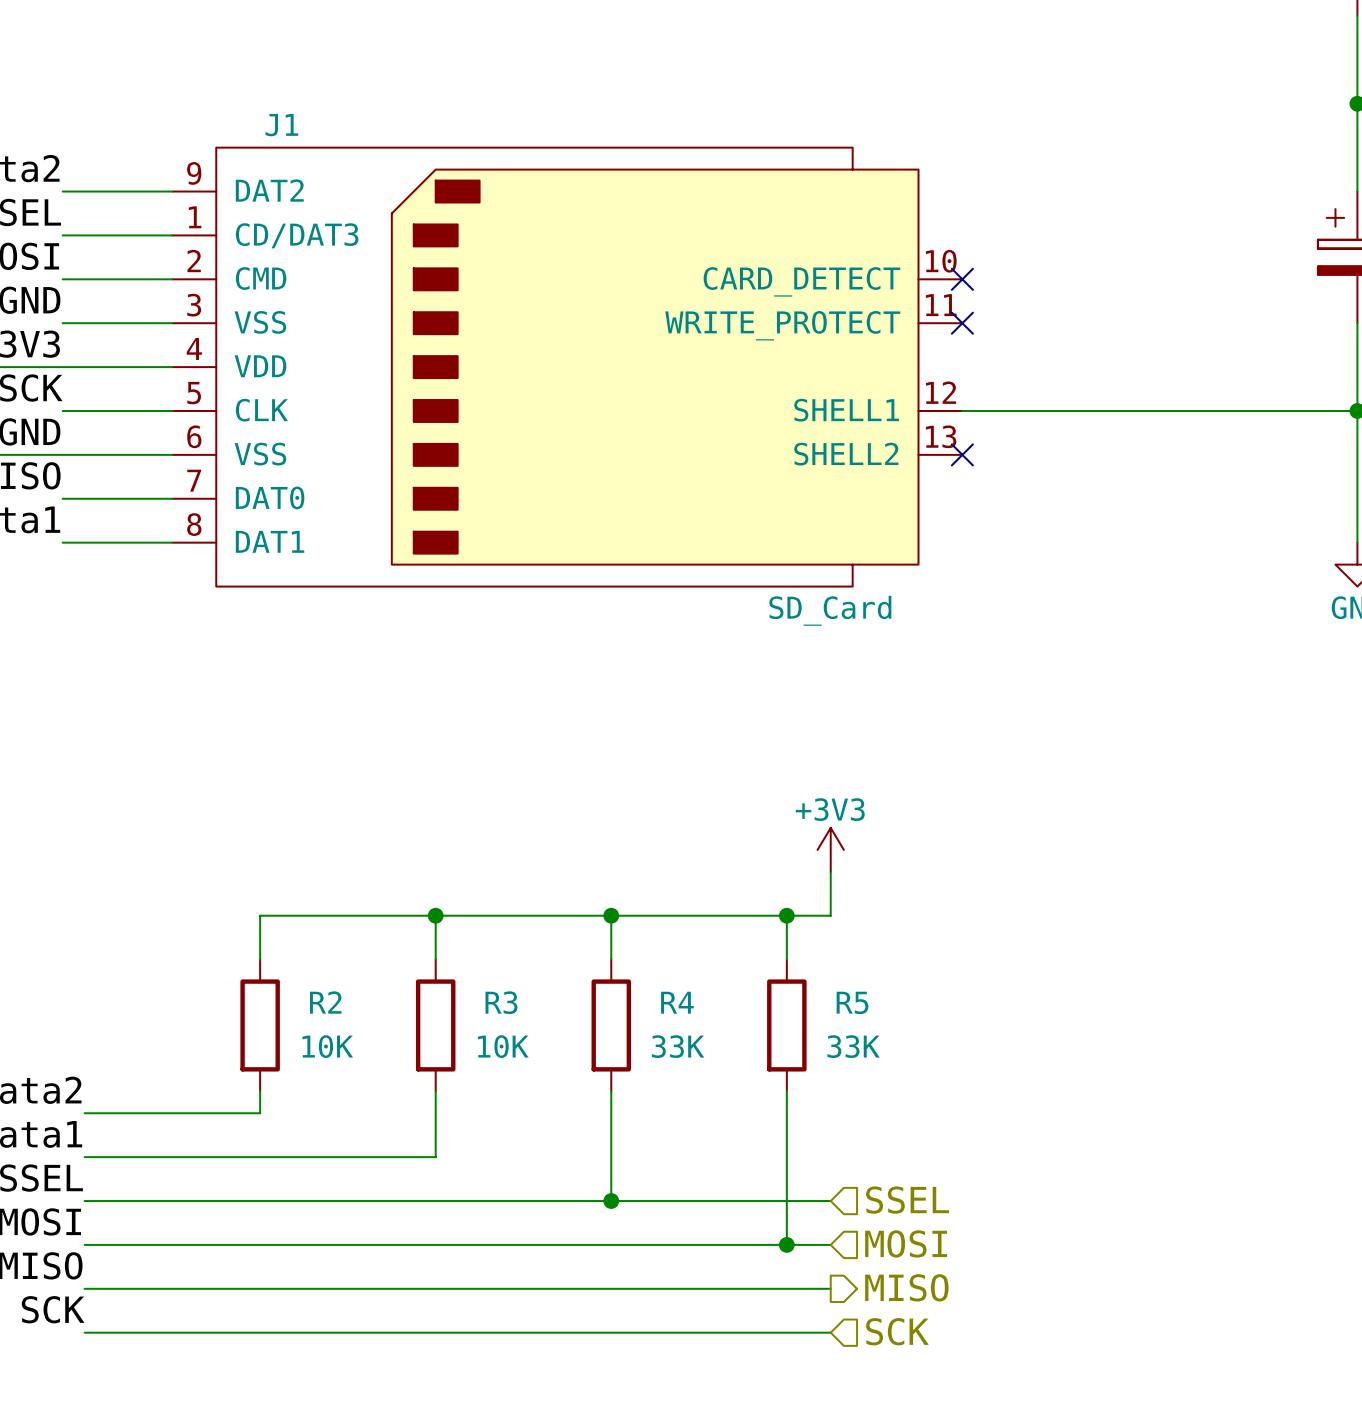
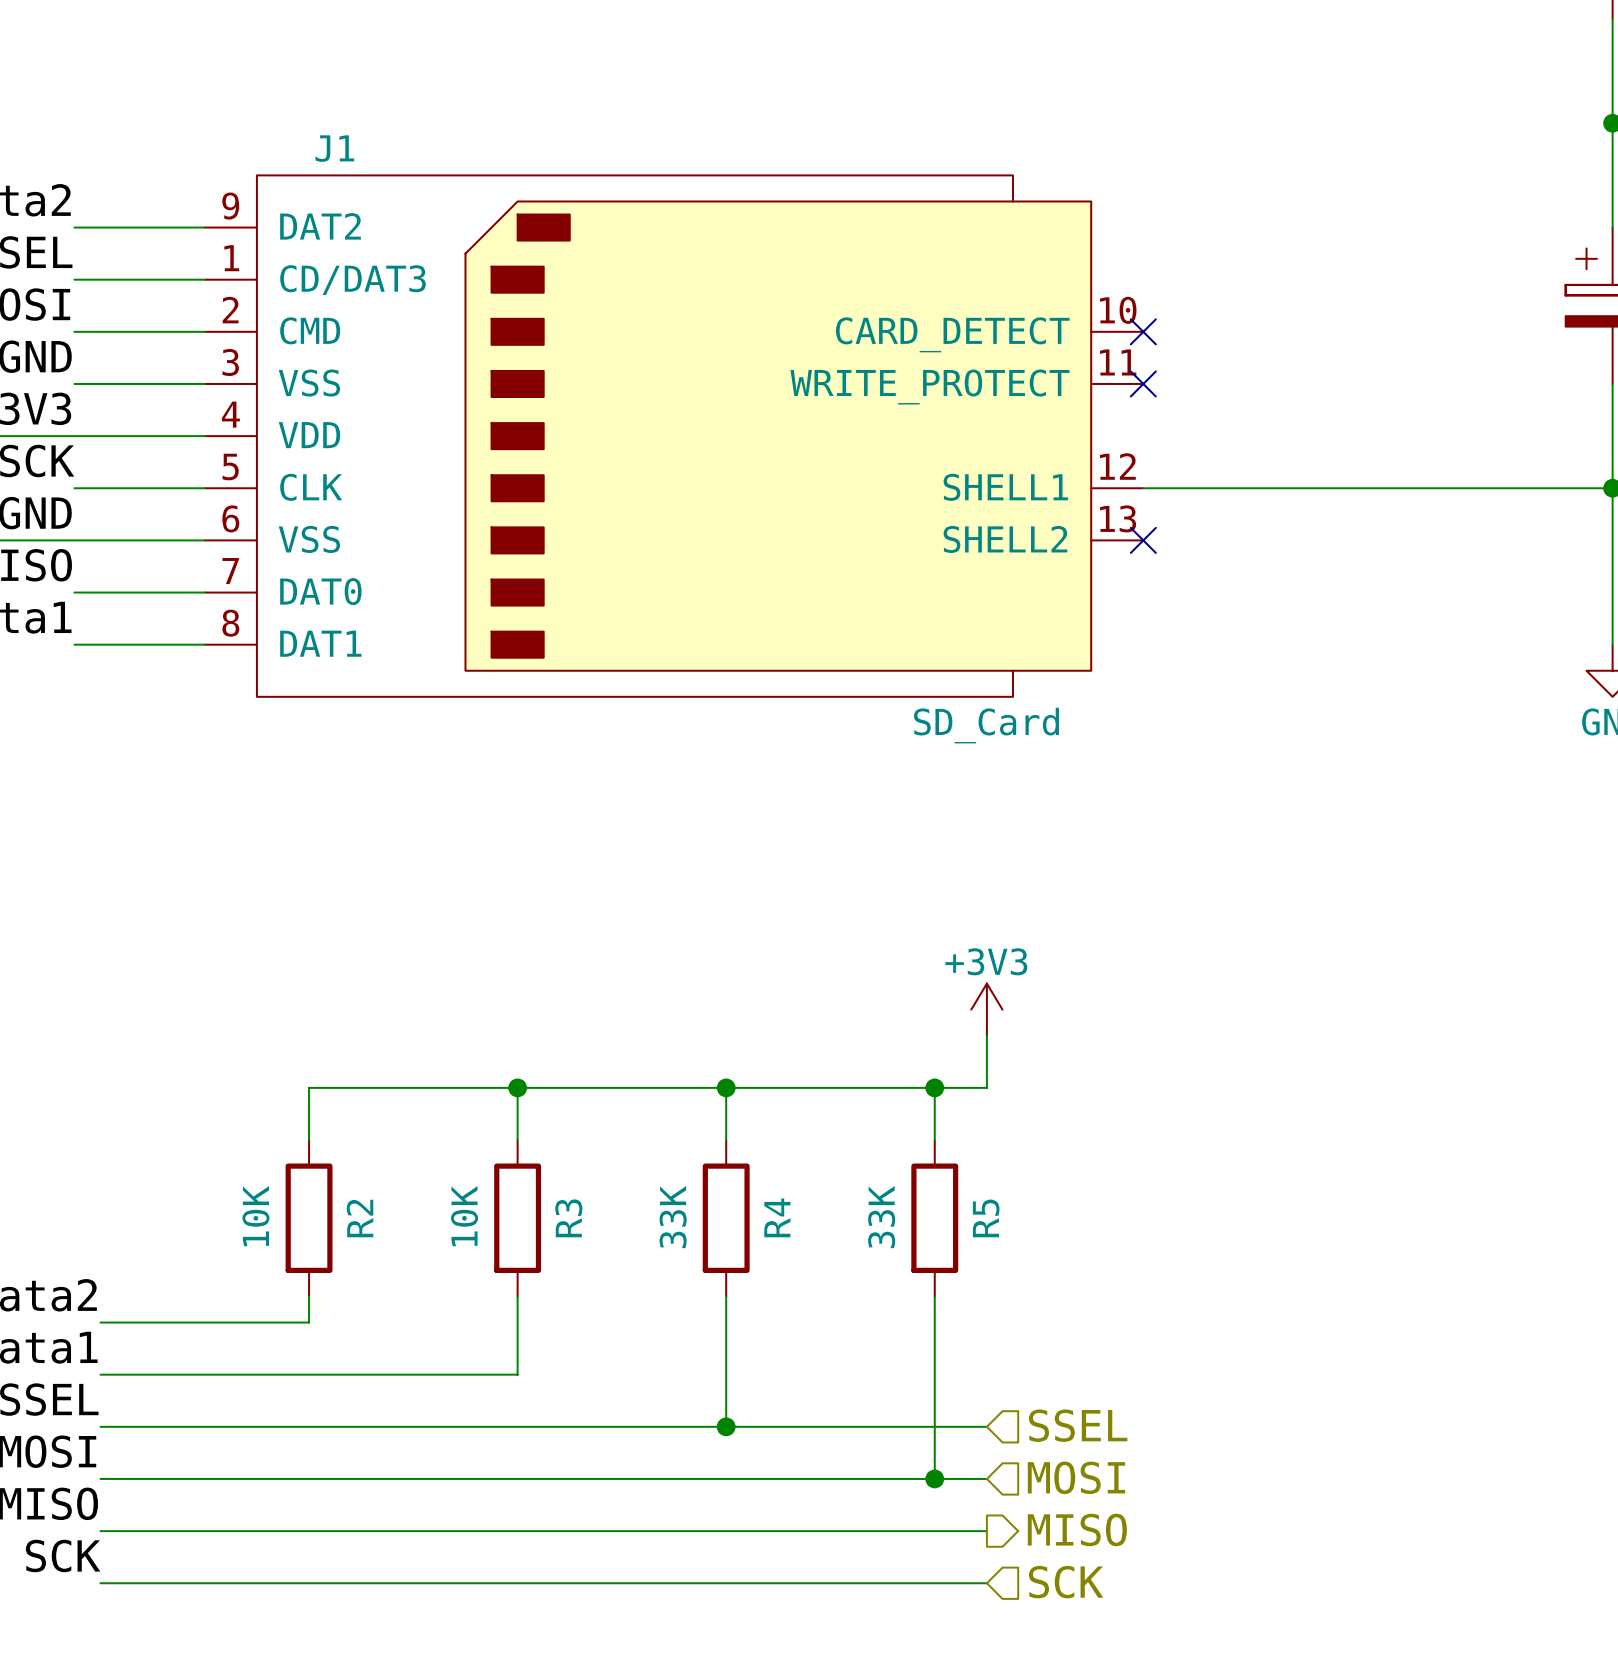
R2 name rotation: 0° (325, 1002) -> 90° counterclockwise (359, 1218)
R3 name rotation: 0° (501, 1002) -> 90° counterclockwise (568, 1218)
R4 name rotation: 0° (677, 1002) -> 90° counterclockwise (777, 1217)
R5 name rotation: 0° (852, 1002) -> 90° counterclockwise (986, 1218)
R2 value rotation: 0° (327, 1046) -> 90° counterclockwise (255, 1216)
R2 value position: 10K (327, 1046) -> 10K (255, 1216)
R3 value rotation: 0° (503, 1046) -> 90° counterclockwise (464, 1216)
R3 value position: 10K (503, 1046) -> 10K (464, 1216)
R4 value rotation: 0° (678, 1046) -> 90° counterclockwise (673, 1217)
R4 value position: 33K (678, 1046) -> 33K (673, 1217)
R5 value rotation: 0° (853, 1046) -> 90° counterclockwise (881, 1217)
R5 value position: 33K (853, 1046) -> 33K (881, 1217)

